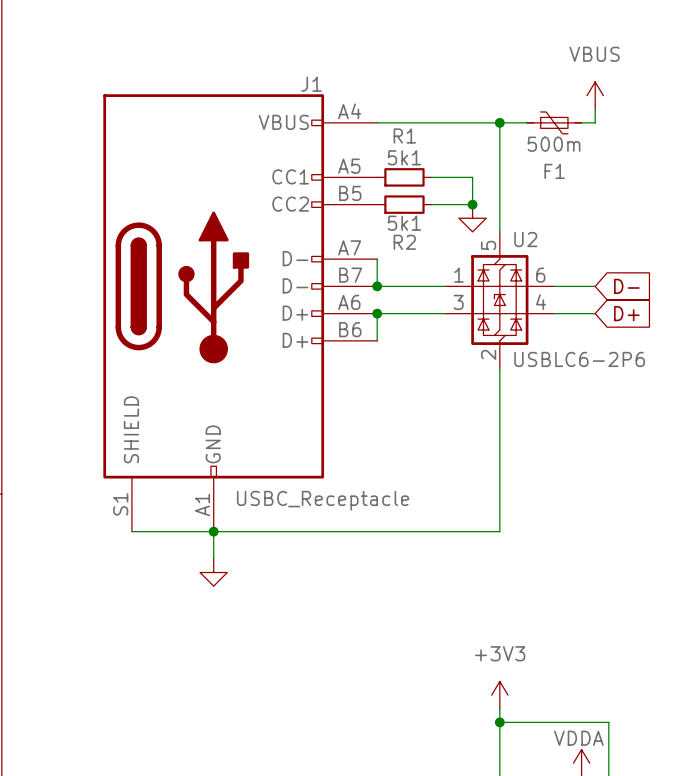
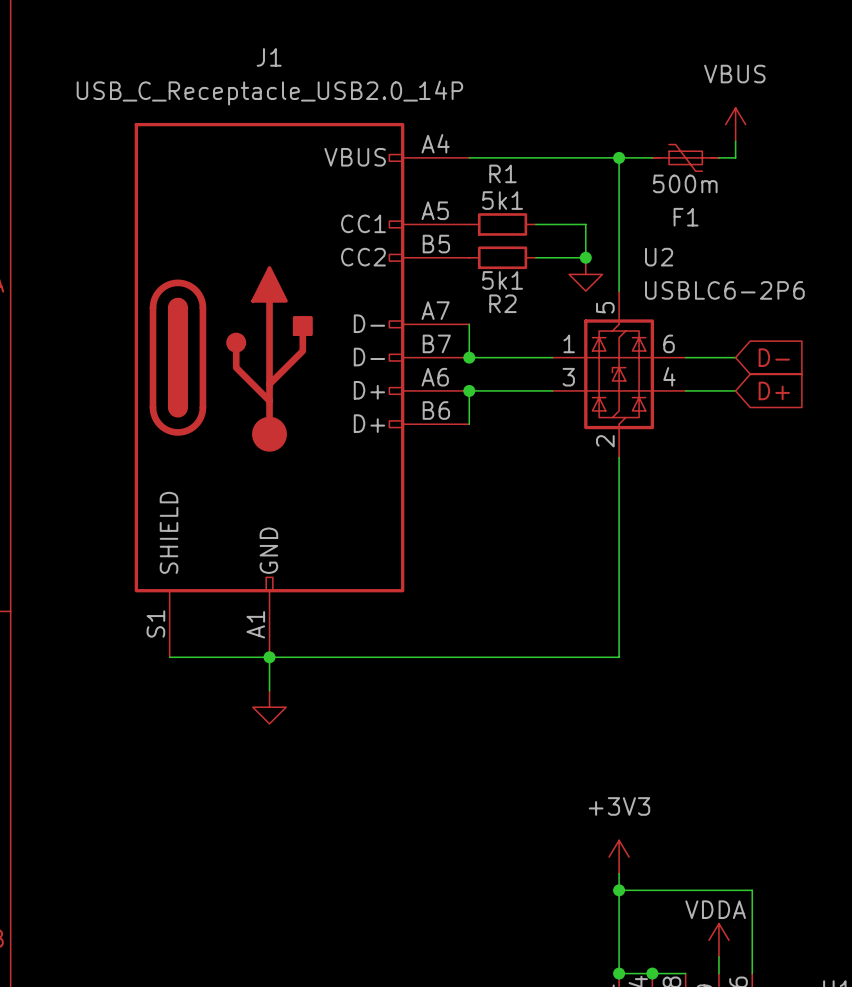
J1 name position: J1 (311, 84) -> J1 (269, 57)
U2 name position: U2 (525, 239) -> U2 (659, 257)
U2 value position: USBLC6-2P6 (579, 359) -> USBLC6-2P6 (724, 290)
J1 value: USBC_Receptacle (323, 500) -> USB_C_Receptacle_USB2.0_14P (269, 93)

